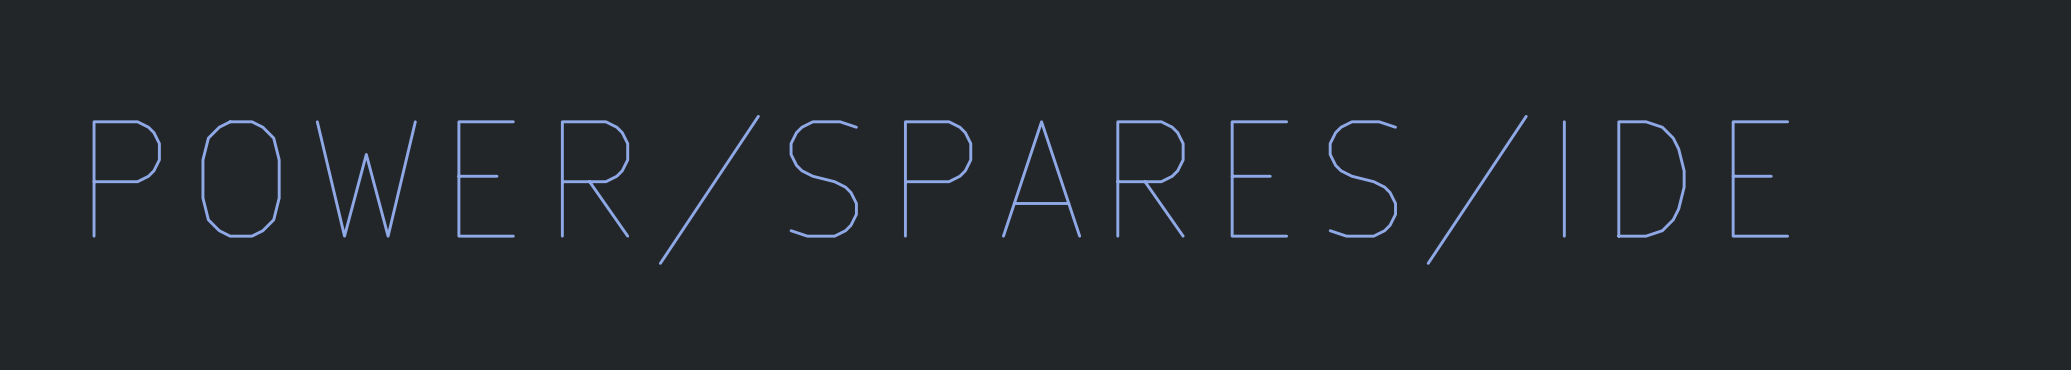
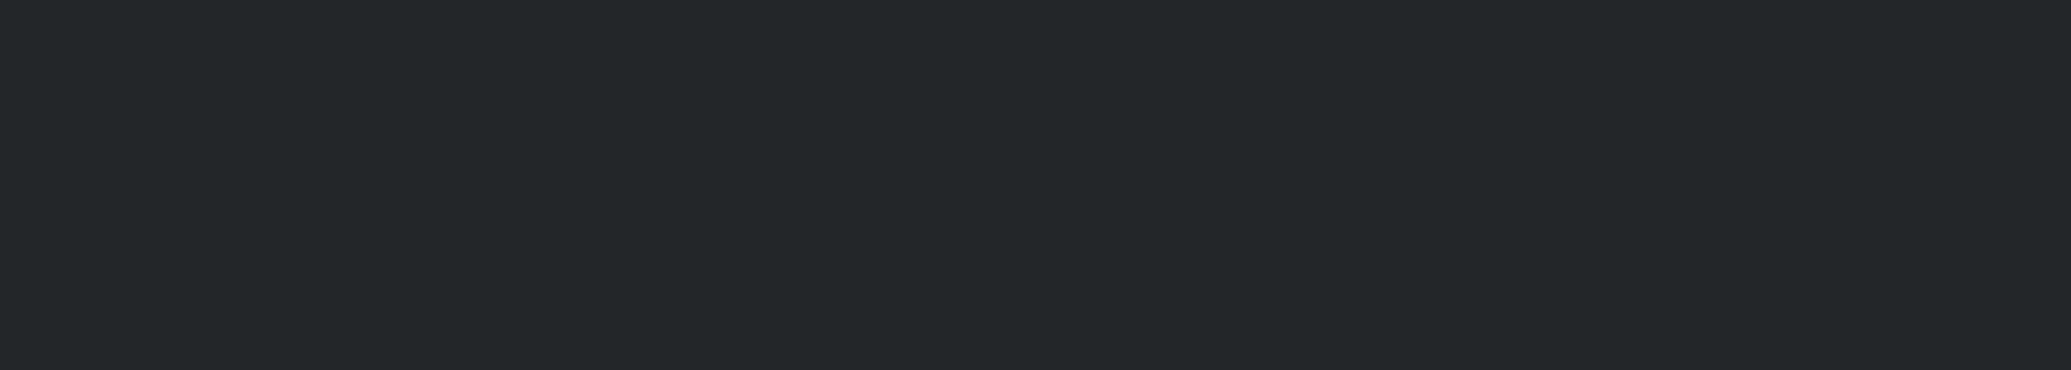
text: POWER/SPARES/IDE (940, 189) -> none

